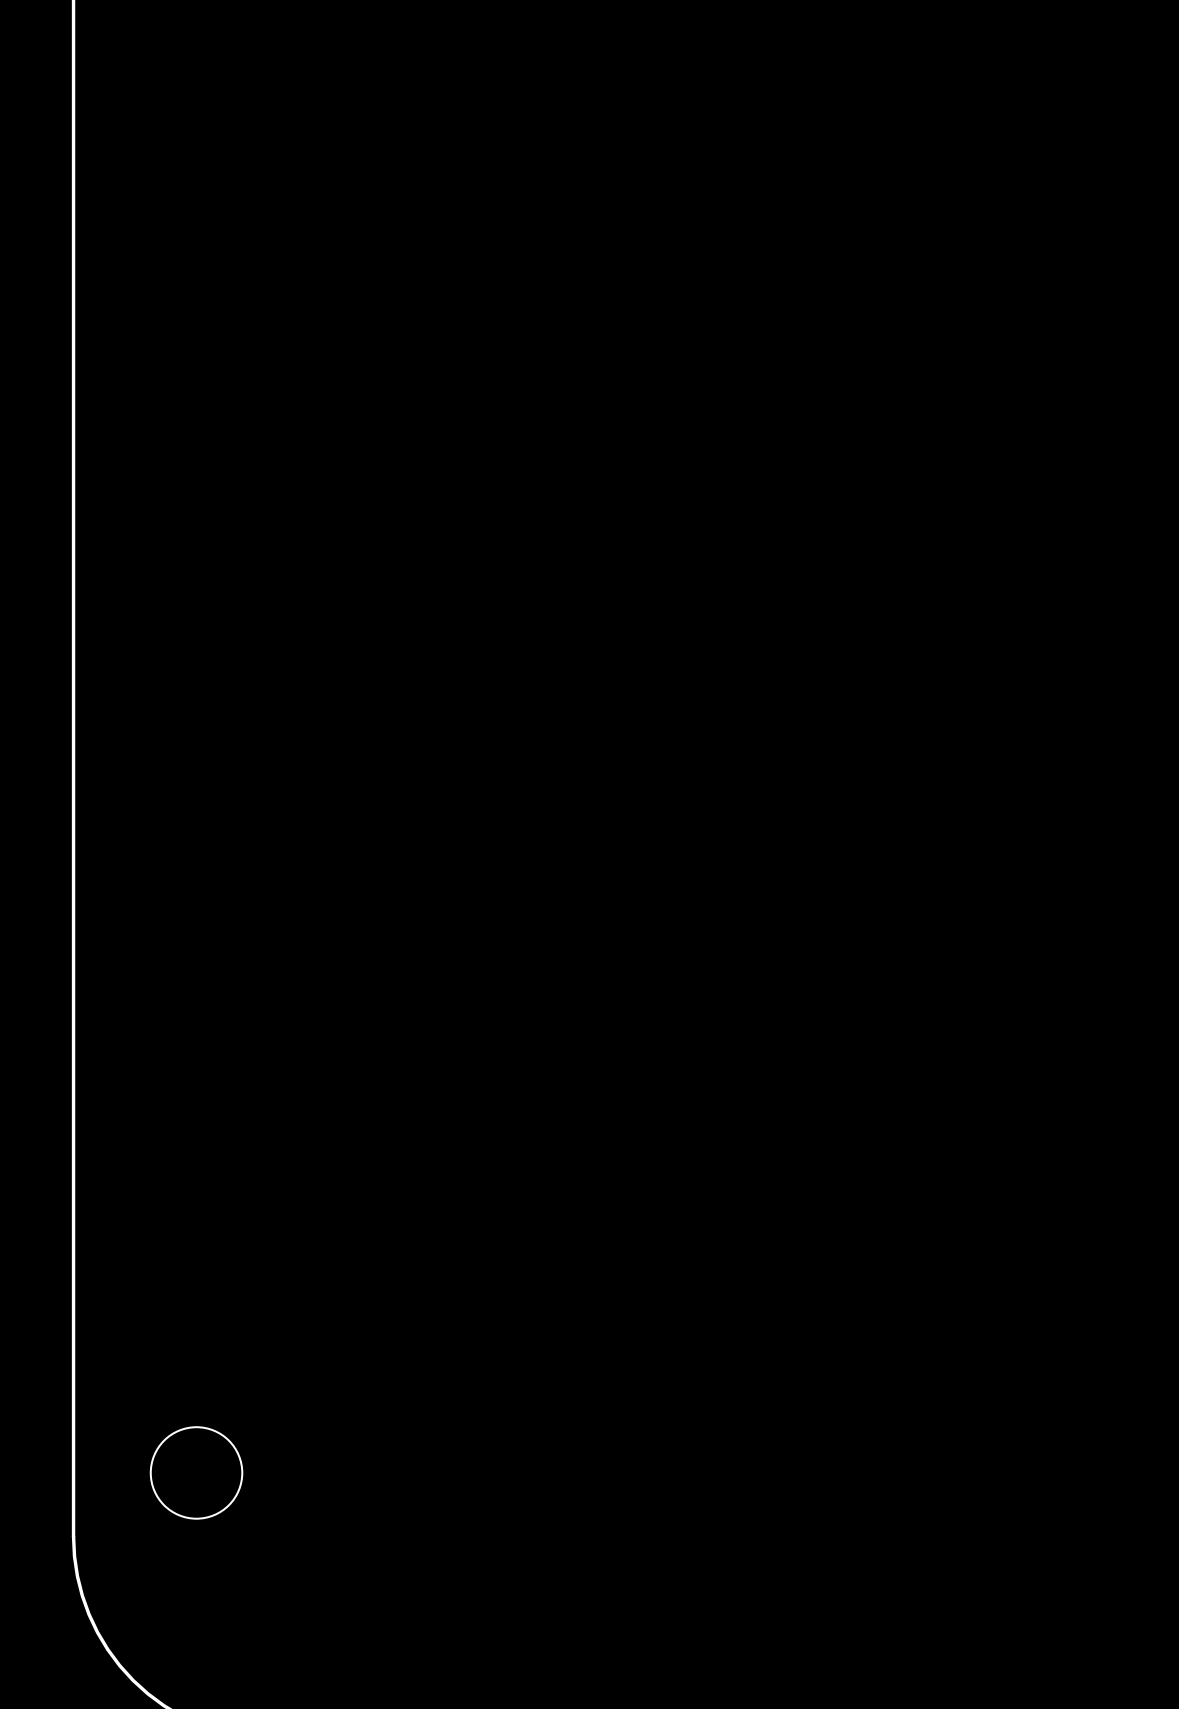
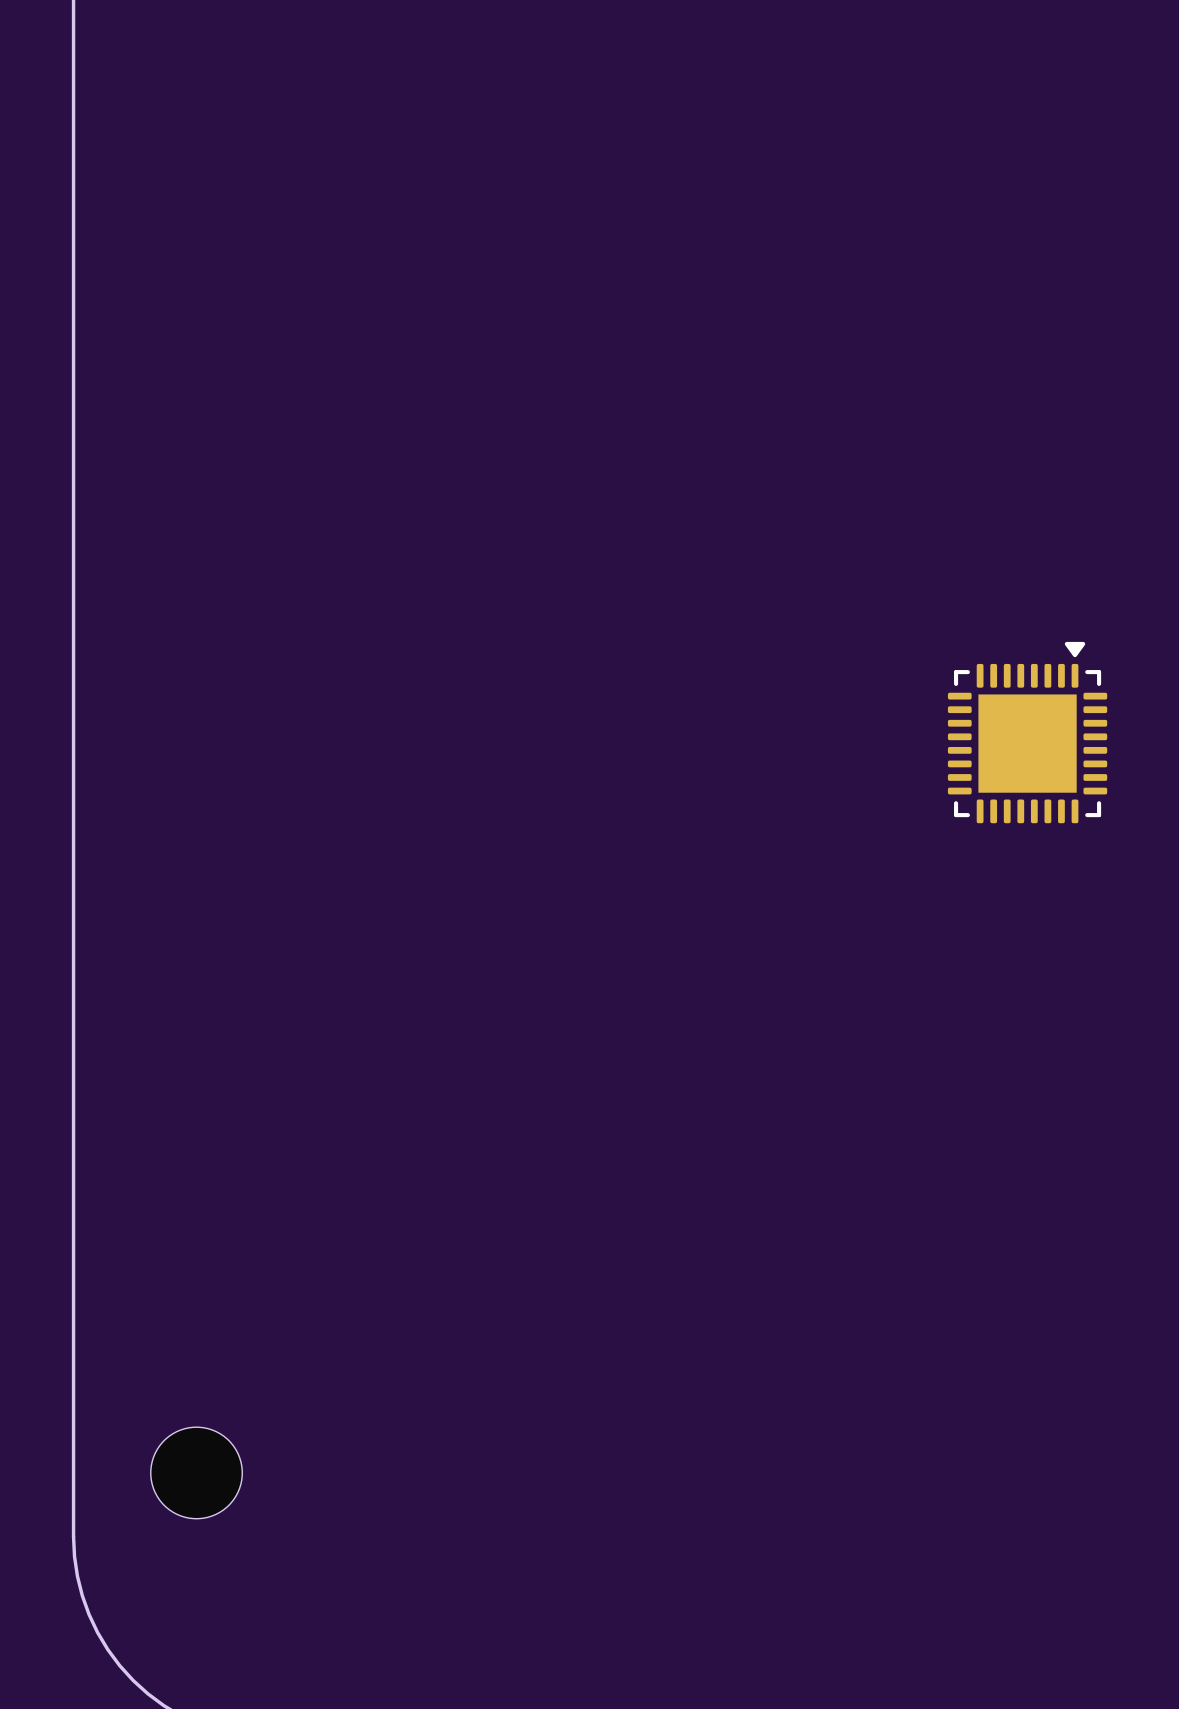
part: none -> (1027, 732)

